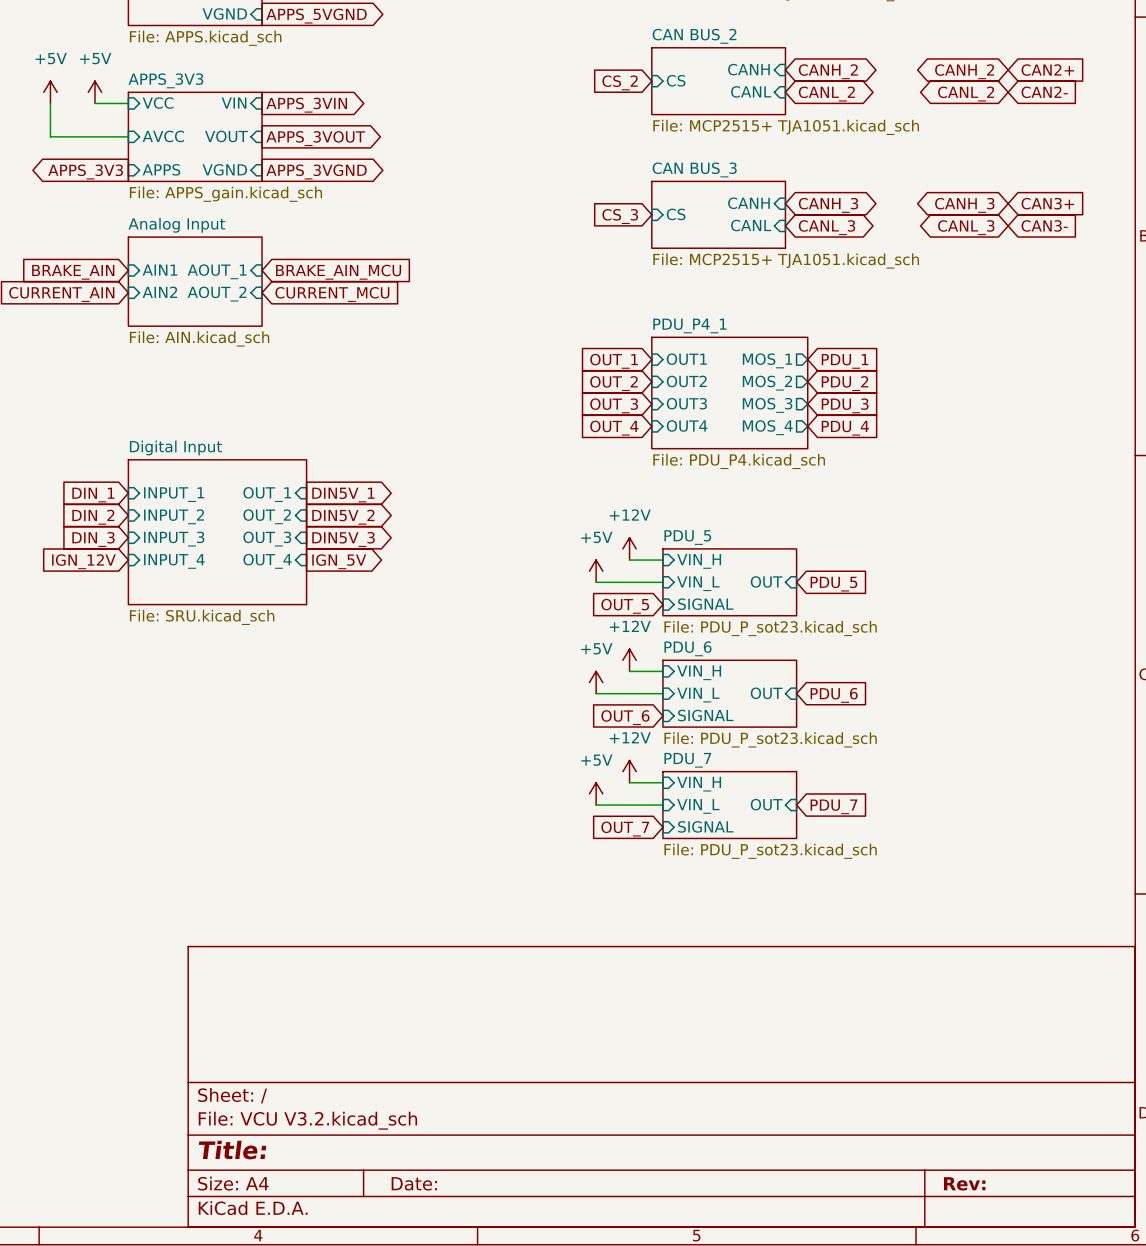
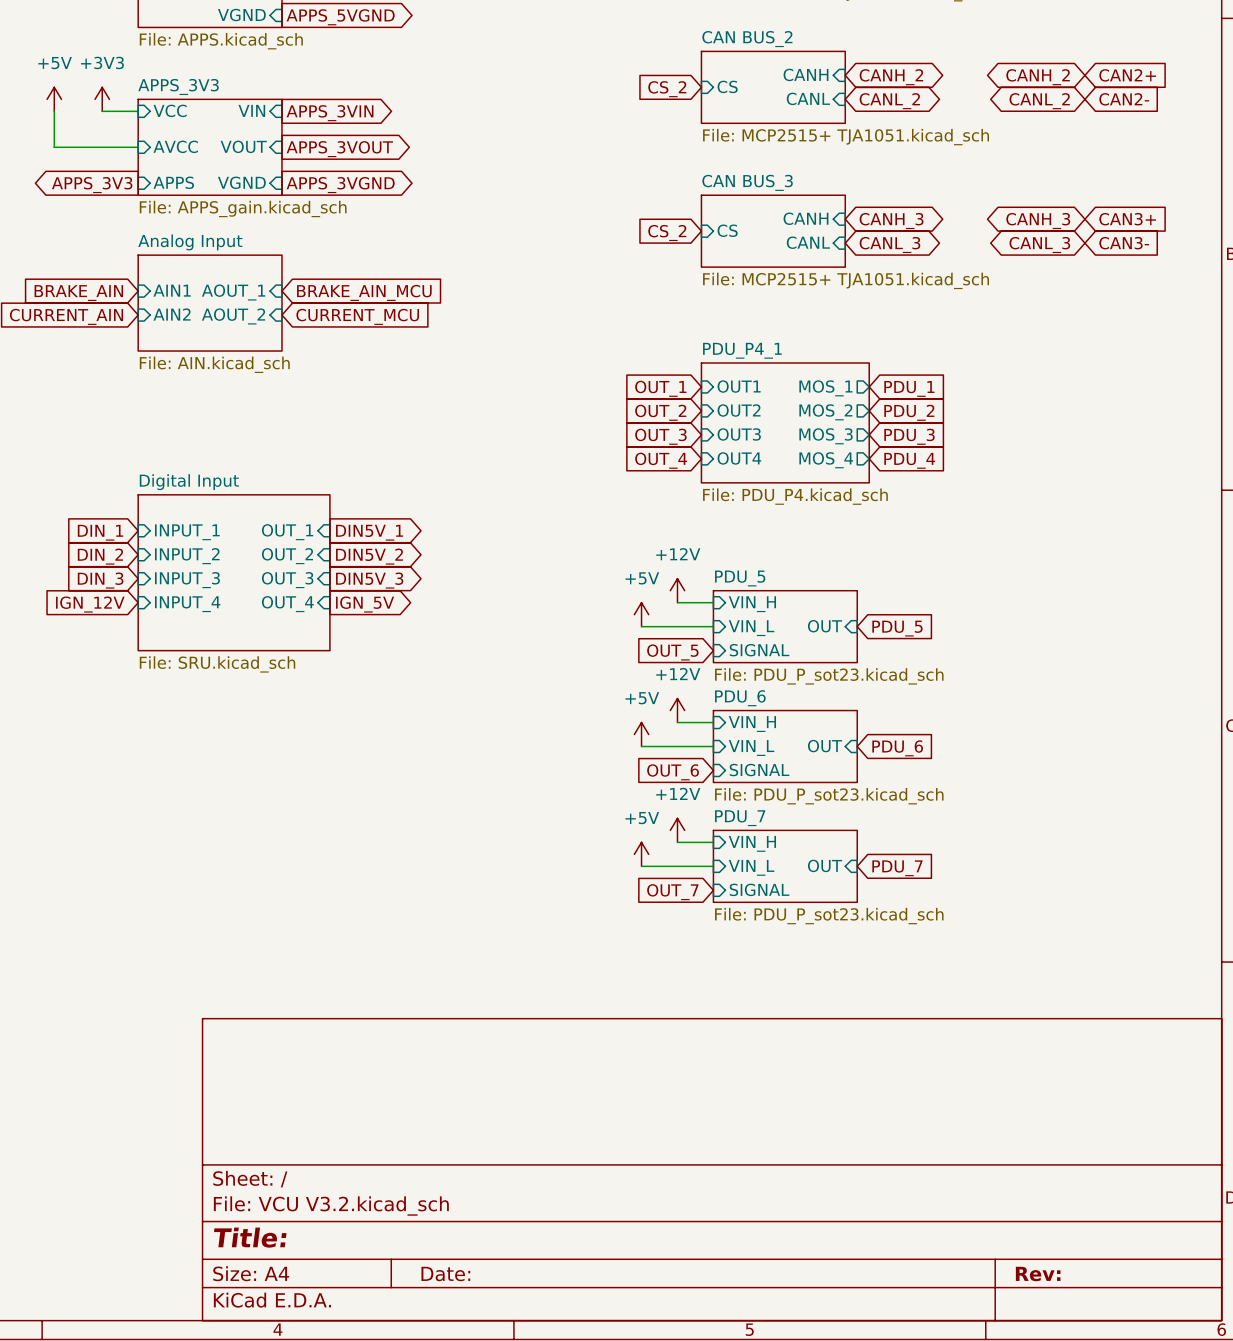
power symbol: +5V (94, 92) -> +3V3 (102, 99)
global label: CS_3 (620, 216) -> CS_2 (667, 233)

